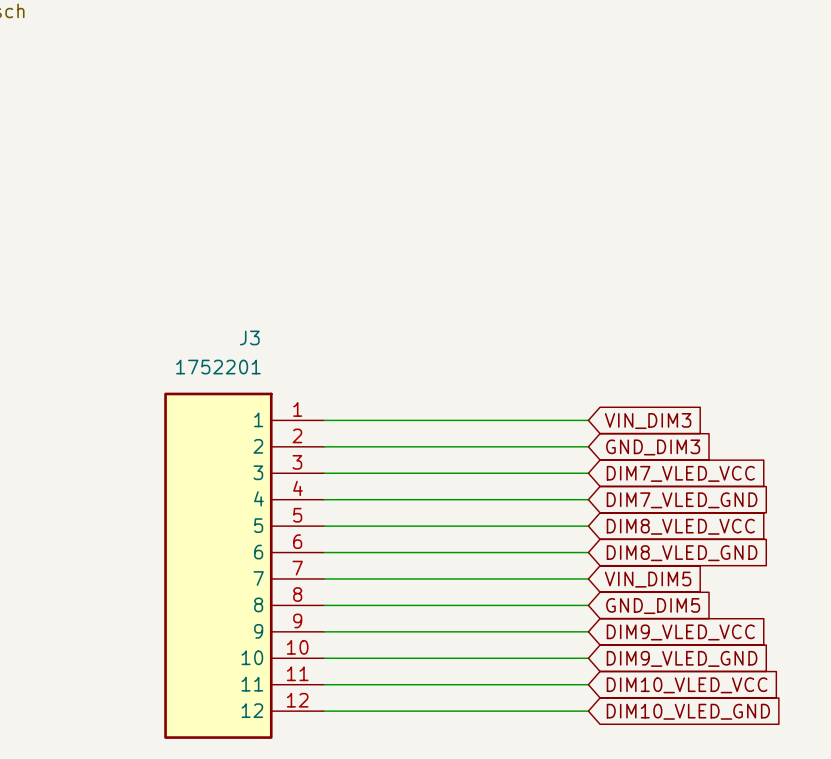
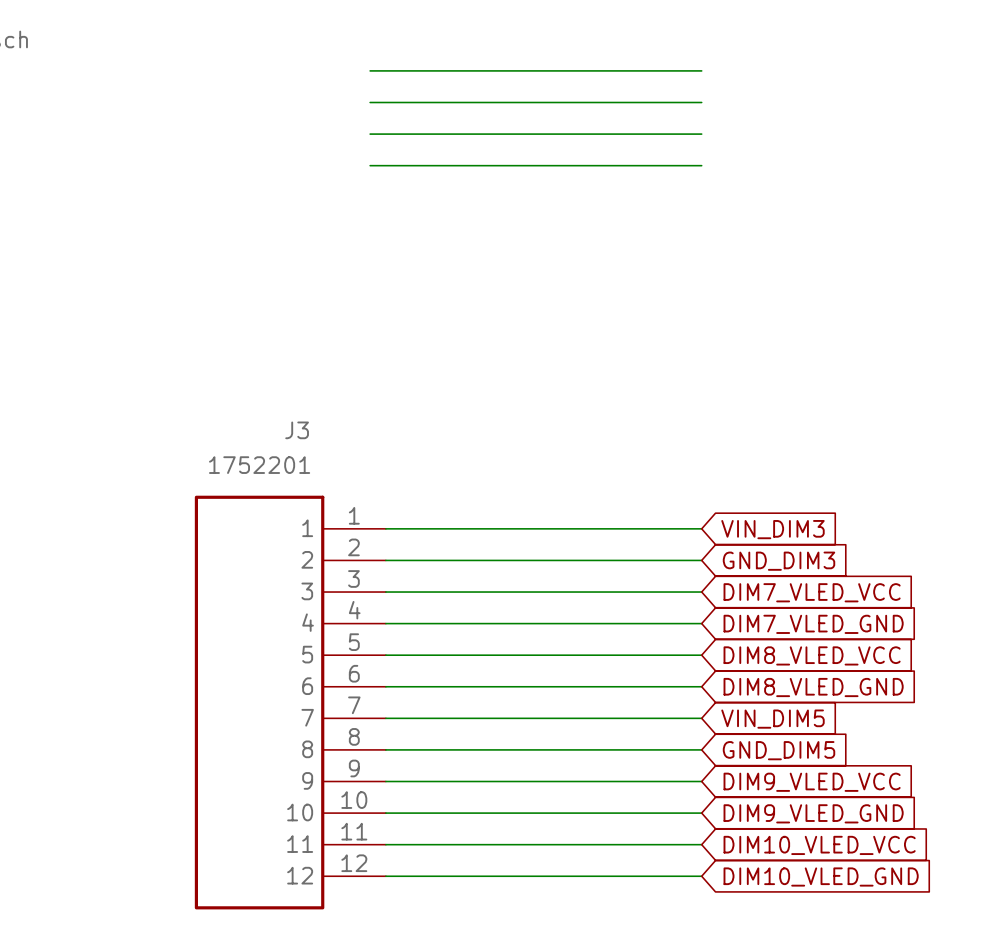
wire: none -> (370, 70) (701, 70)
wire: none -> (370, 102) (701, 102)
wire: none -> (370, 134) (701, 134)
wire: none -> (370, 165) (701, 165)

